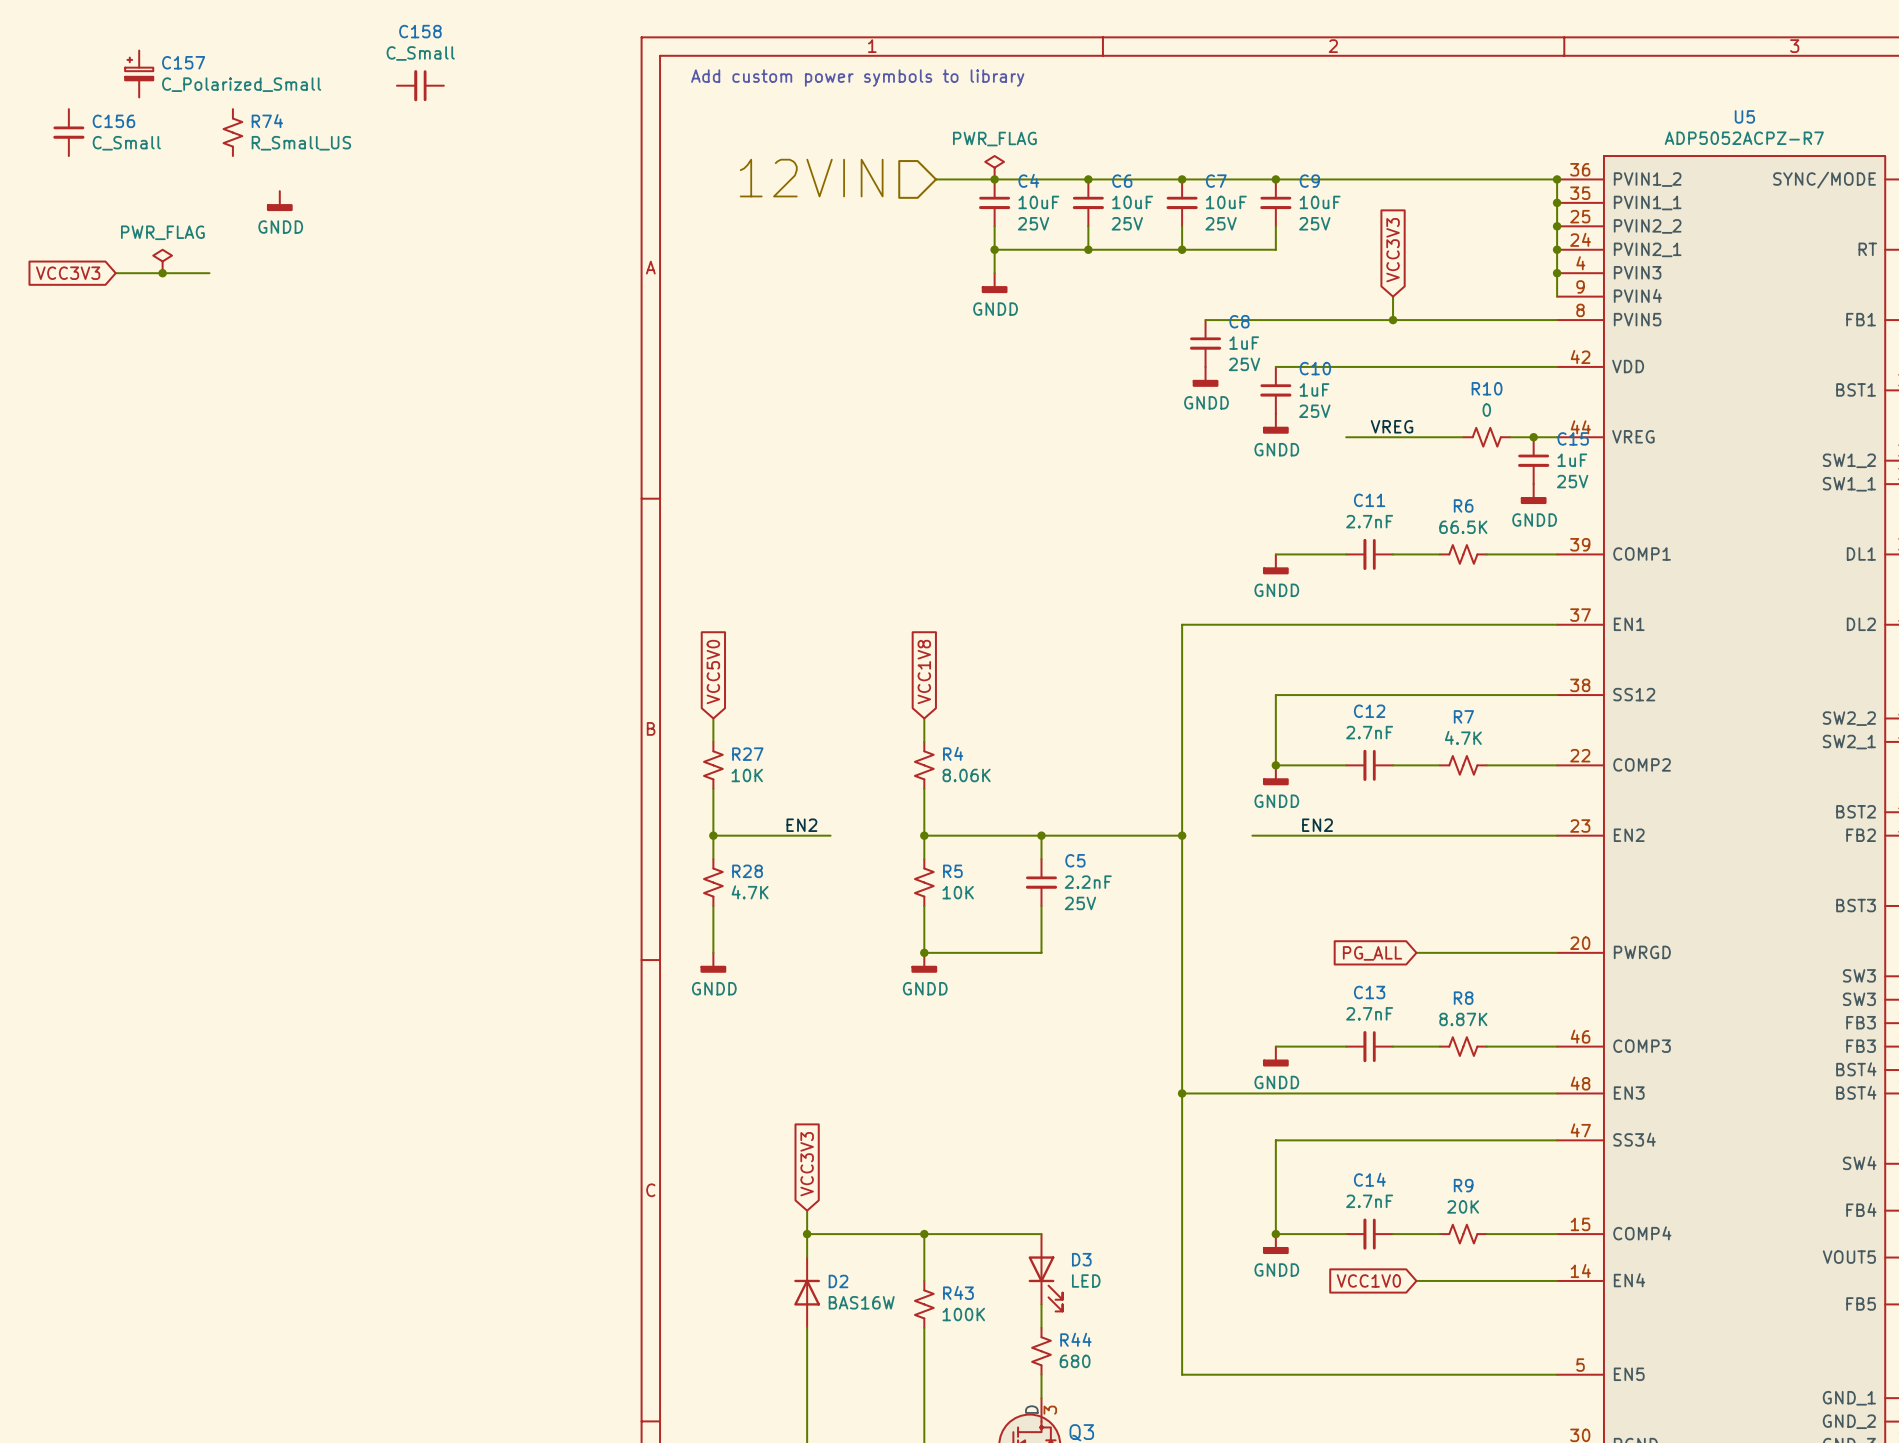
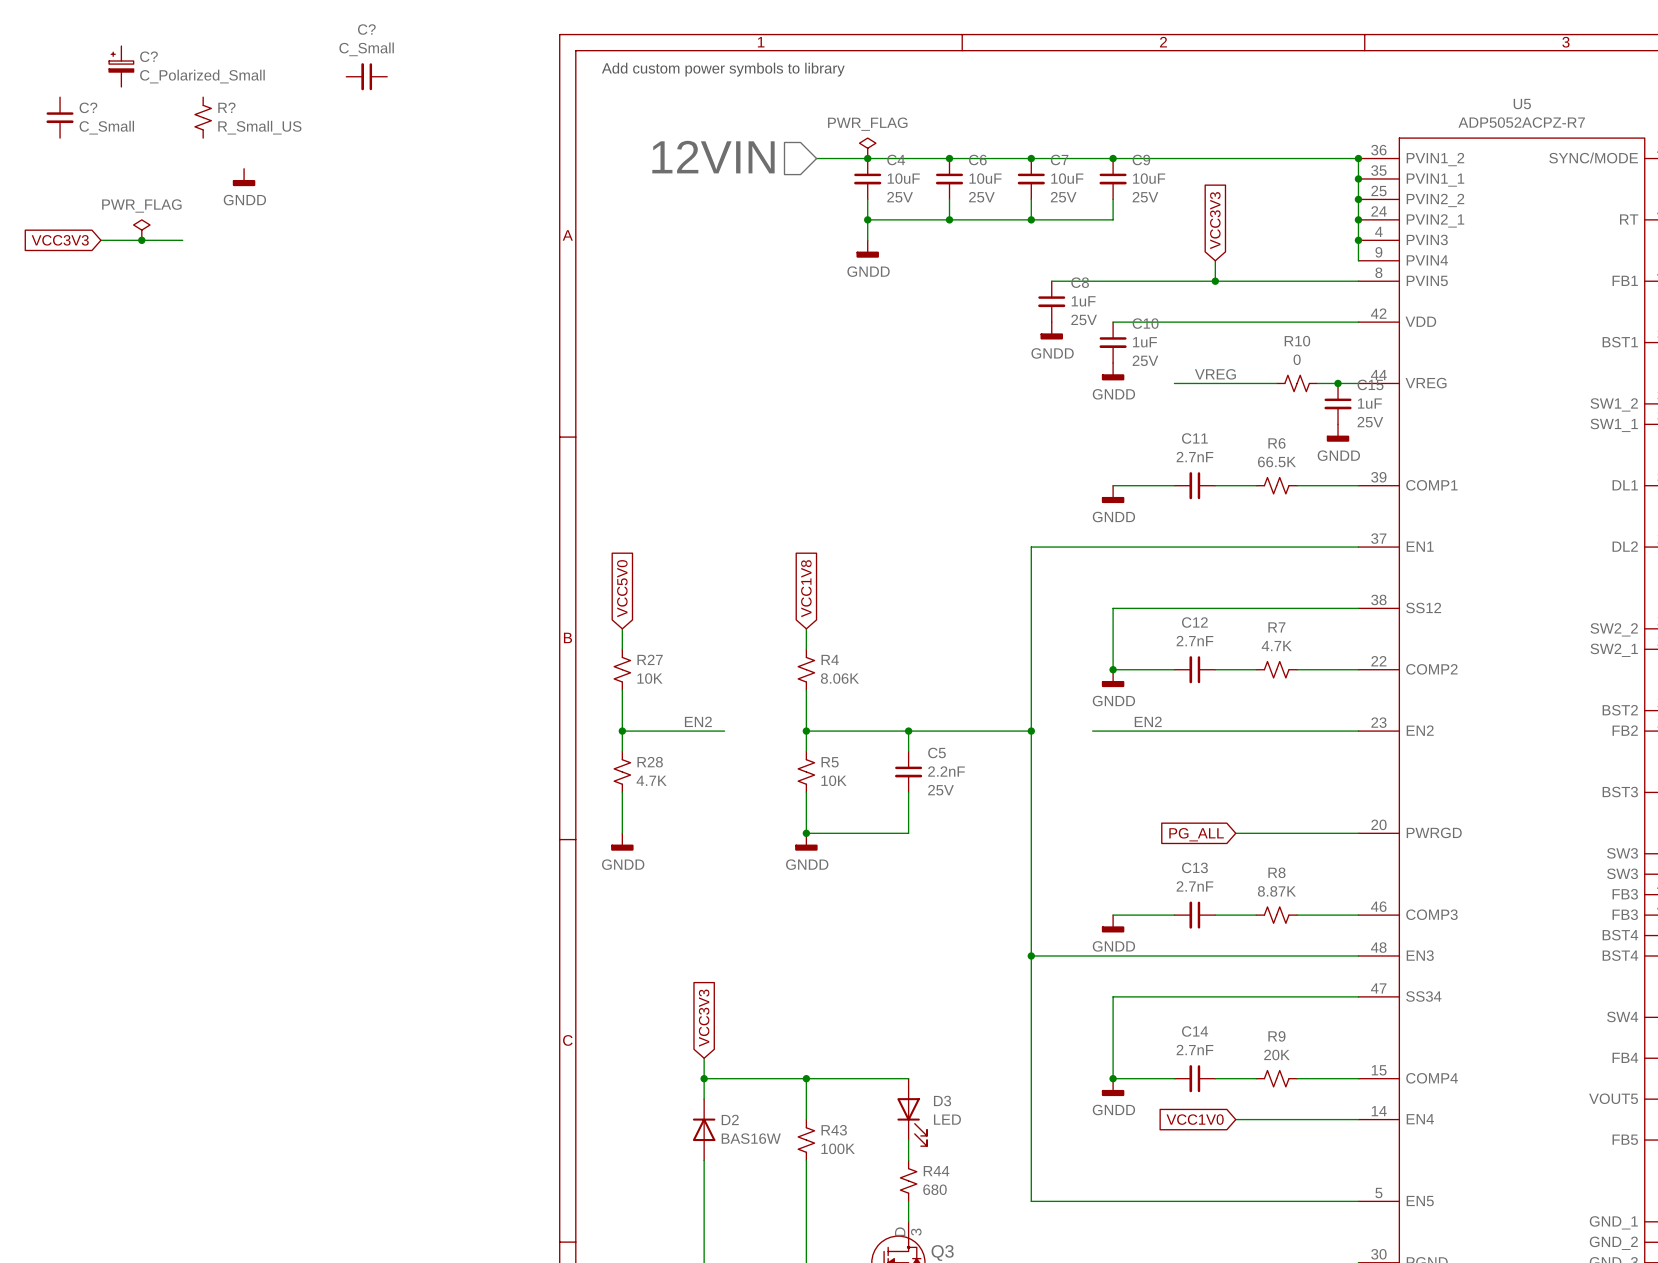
C158 name: C158 (420, 31) -> C? (366, 29)
C157 name: C157 (183, 62) -> C? (148, 56)
C156 name: C156 (113, 121) -> C? (88, 107)
R74 name: R74 (267, 121) -> R? (226, 107)

